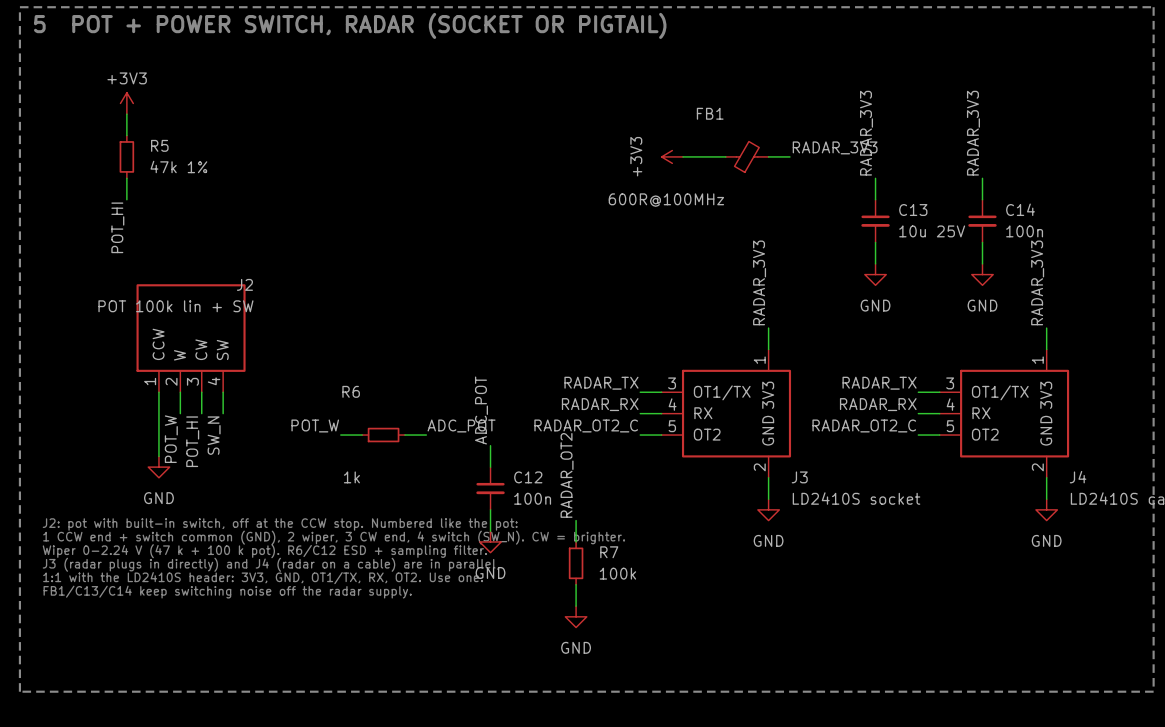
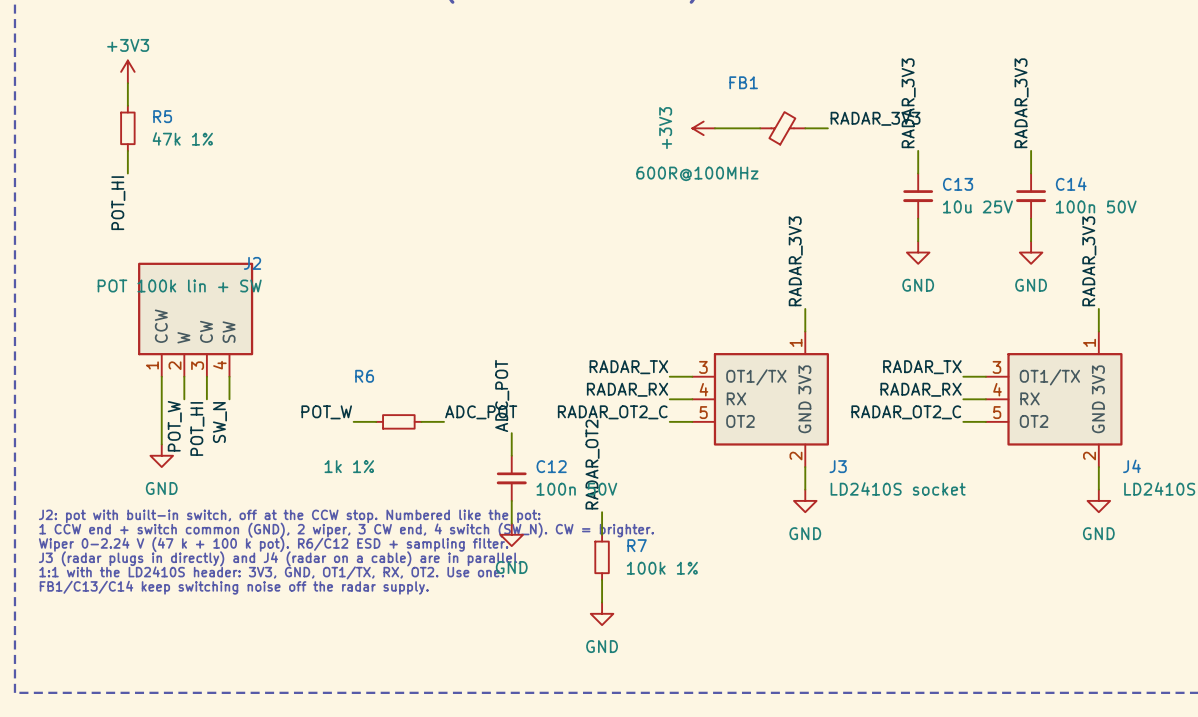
C14 value: 100n (1024, 231) -> 100n 50V (1096, 206)
R6 value: 1k (351, 477) -> 1k 1% (349, 466)
C12 value: 100n (532, 498) -> 100n 50V (576, 489)
R7 value: 100k (617, 573) -> 100k 1% (662, 568)

